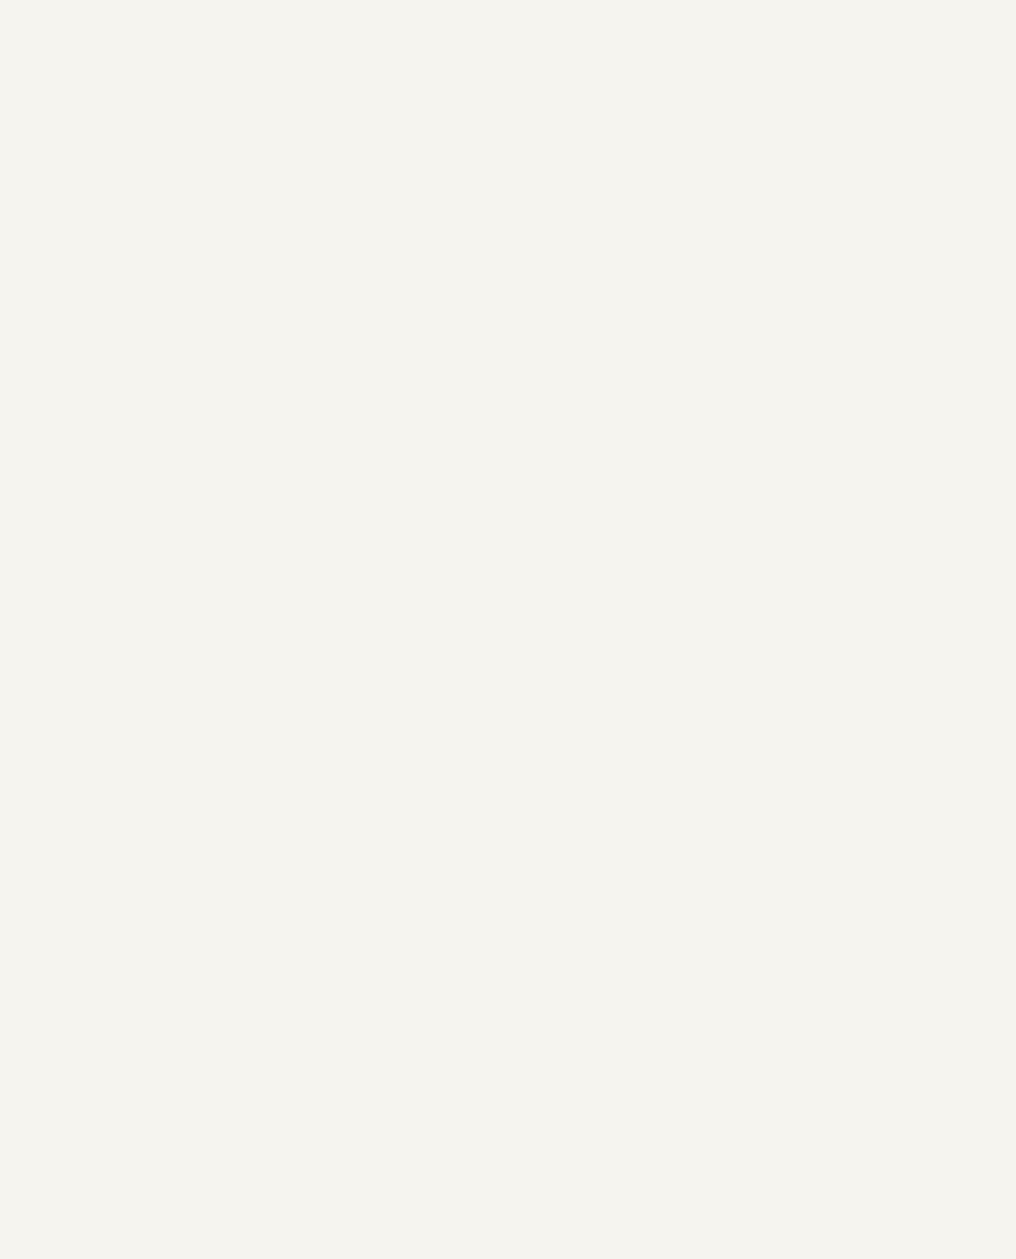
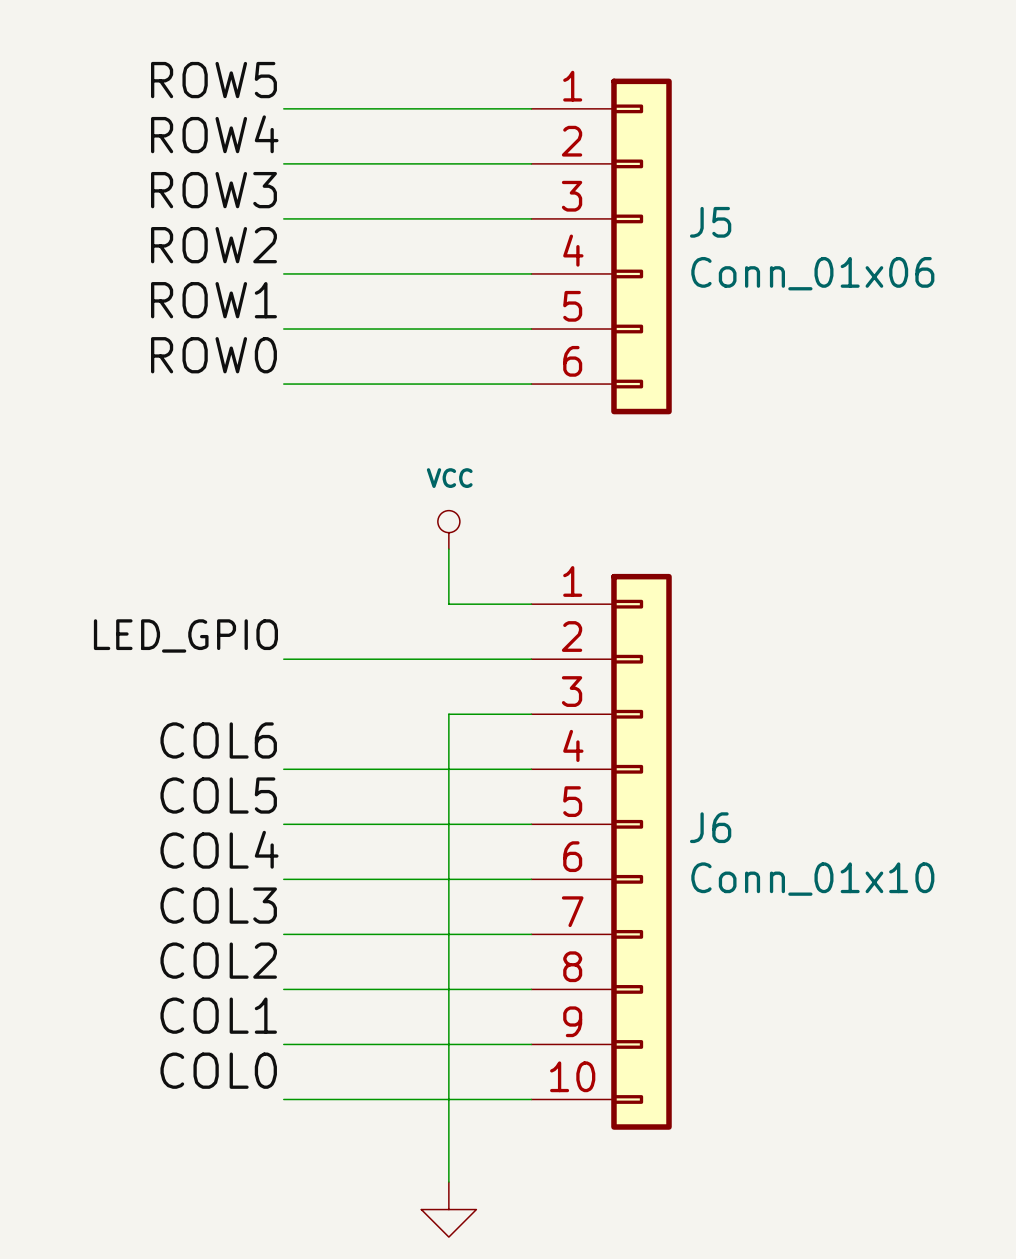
label: none -> ROW5 (213, 80)
wire: none -> (283, 108) (531, 108)
label: none -> ROW4 (214, 134)
wire: none -> (283, 163) (531, 163)
label: none -> ROW3 (213, 190)
wire: none -> (283, 218) (531, 218)
label: none -> ROW2 (213, 245)
J5: none -> Conn_01x06 (601, 246)
wire: none -> (283, 273) (531, 273)
label: none -> ROW1 (213, 300)
wire: none -> (283, 329) (531, 329)
label: none -> ROW0 (213, 355)
wire: none -> (283, 384) (531, 384)
power symbol: none -> VCC (448, 529)
wire: none -> (448, 549) (448, 604) (531, 604)
label: none -> LED_GPIO (185, 635)
wire: none -> (283, 659) (531, 659)
wire: none -> (531, 714) (448, 714) (448, 1182)
label: none -> COL6 (218, 740)
wire: none -> (283, 769) (531, 769)
label: none -> COL5 (218, 795)
wire: none -> (283, 824) (531, 824)
label: none -> COL4 (219, 849)
J6: none -> Conn_01x10 (601, 851)
wire: none -> (283, 879) (531, 879)
label: none -> COL3 (218, 905)
wire: none -> (283, 934) (531, 934)
label: none -> COL2 (218, 960)
wire: none -> (283, 989) (531, 989)
label: none -> COL1 (218, 1015)
wire: none -> (283, 1044) (531, 1044)
label: none -> COL0 (218, 1070)
wire: none -> (283, 1099) (531, 1099)
power symbol: none -> (448, 1209)

